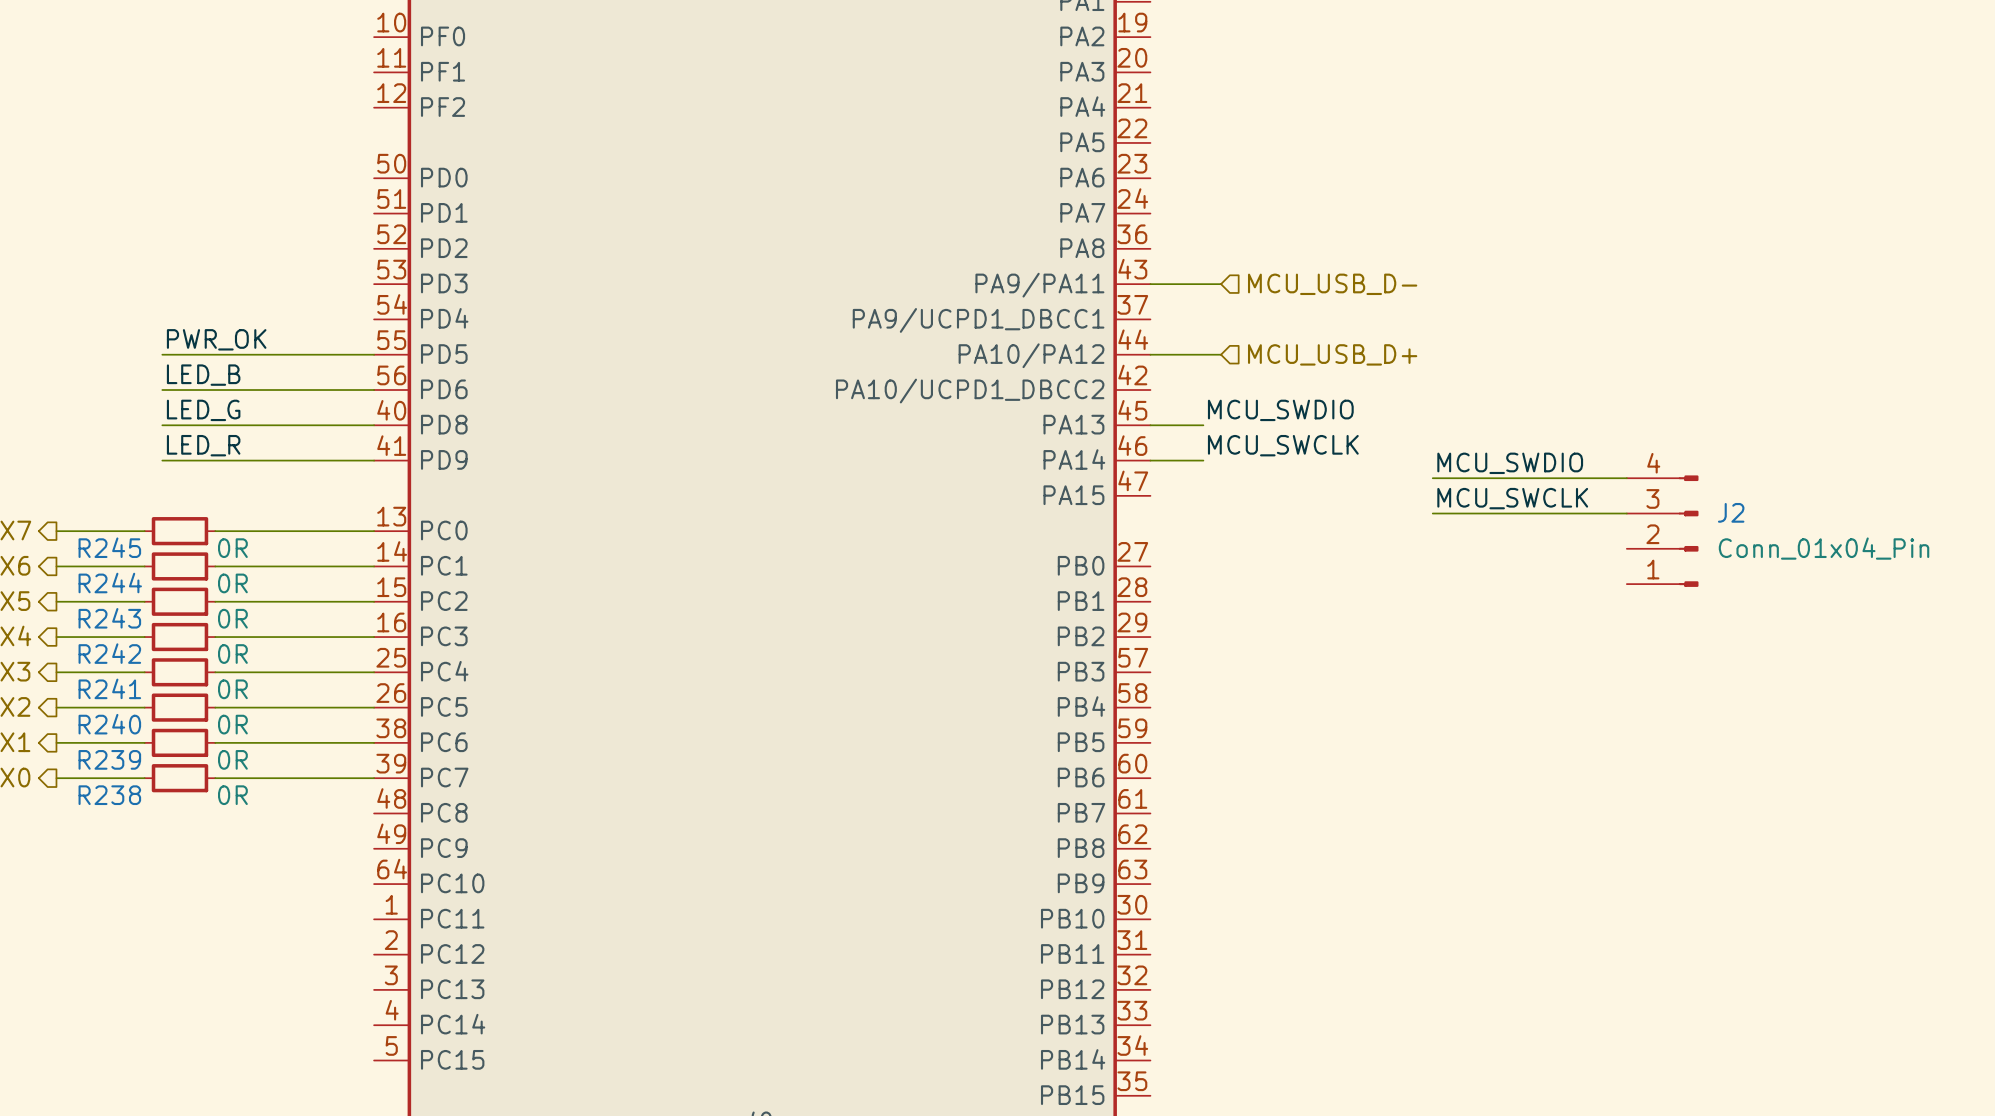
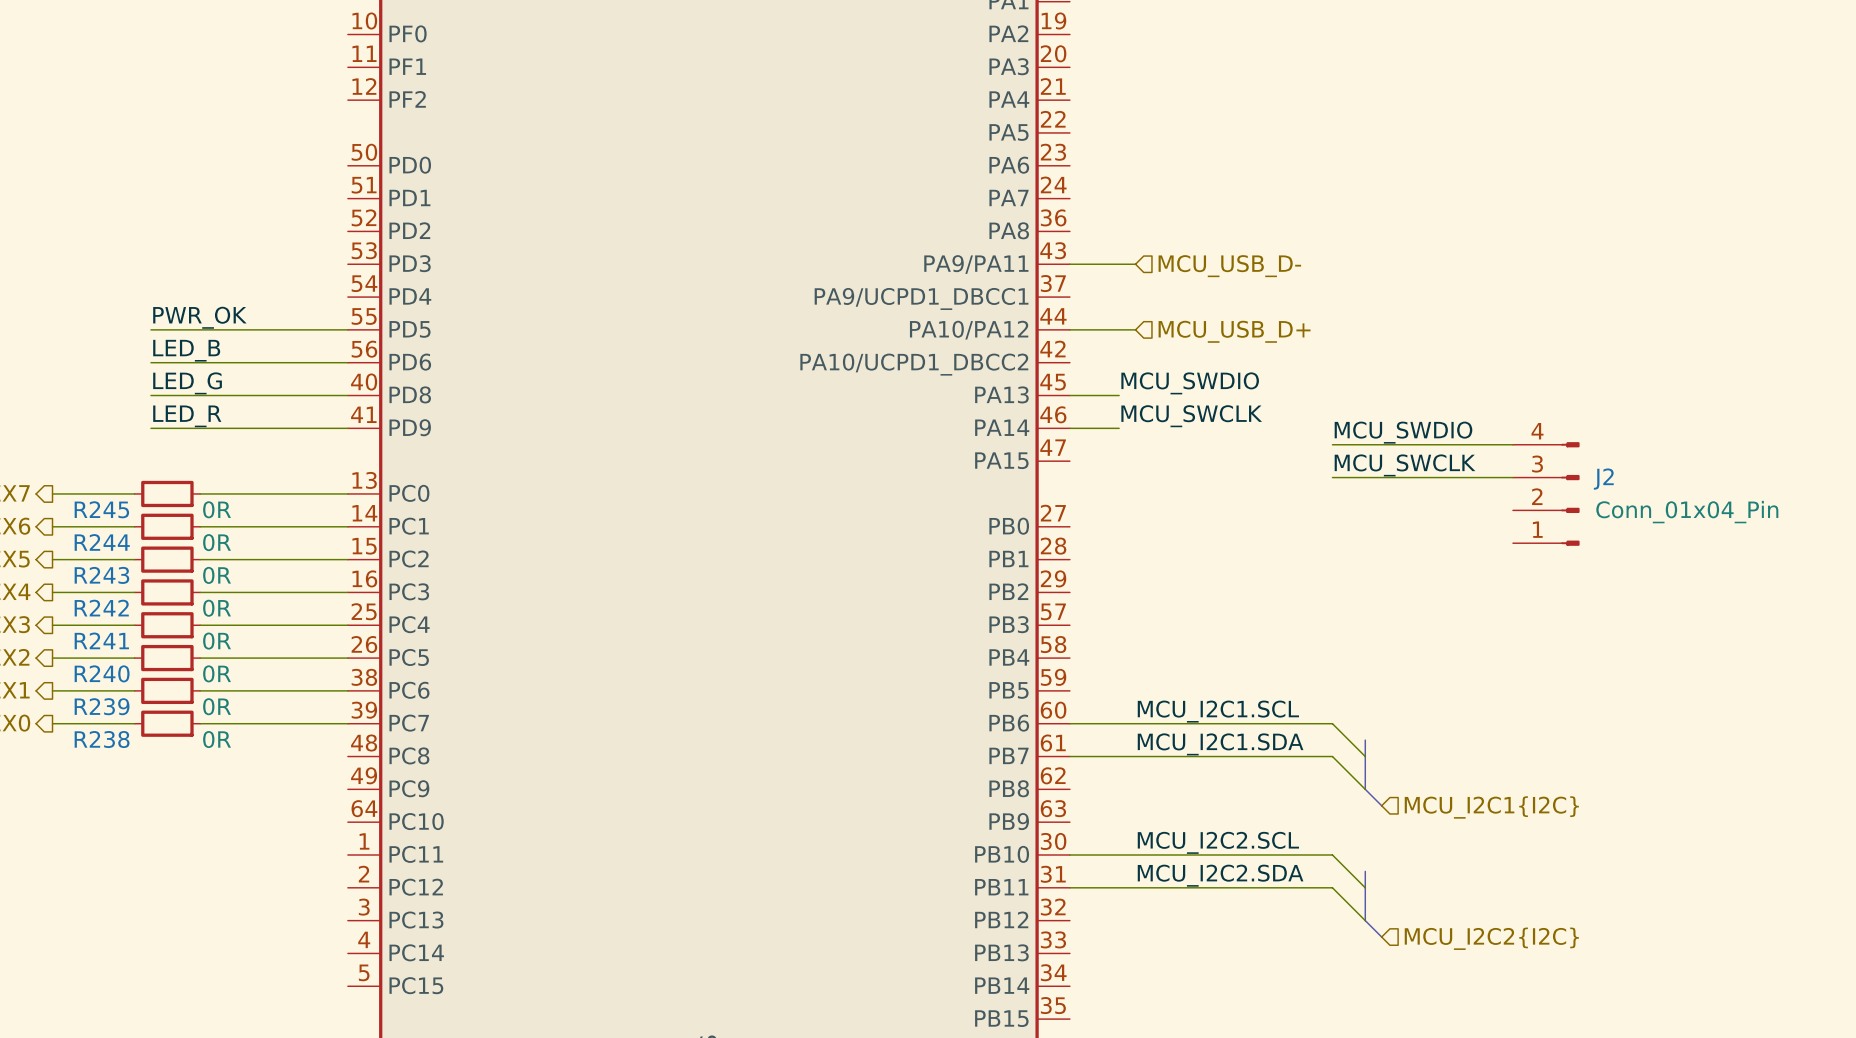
label: none -> MCU_I2C1.SCL (1218, 711)
wire: none -> (1069, 723) (1332, 723) (1365, 756)
bus: none -> (1365, 740) (1365, 789) (1381, 805)
label: none -> MCU_I2C1.SDA (1220, 744)
wire: none -> (1069, 756) (1332, 756) (1365, 789)
hierarchical label: none -> MCU_I2C1{I2C} (1491, 807)
label: none -> MCU_I2C2.SCL (1218, 842)
wire: none -> (1069, 854) (1332, 854) (1365, 887)
bus: none -> (1365, 871) (1365, 920) (1381, 937)
label: none -> MCU_I2C2.SDA (1220, 875)
wire: none -> (1069, 887) (1332, 887) (1365, 920)
hierarchical label: none -> MCU_I2C2{I2C} (1491, 938)

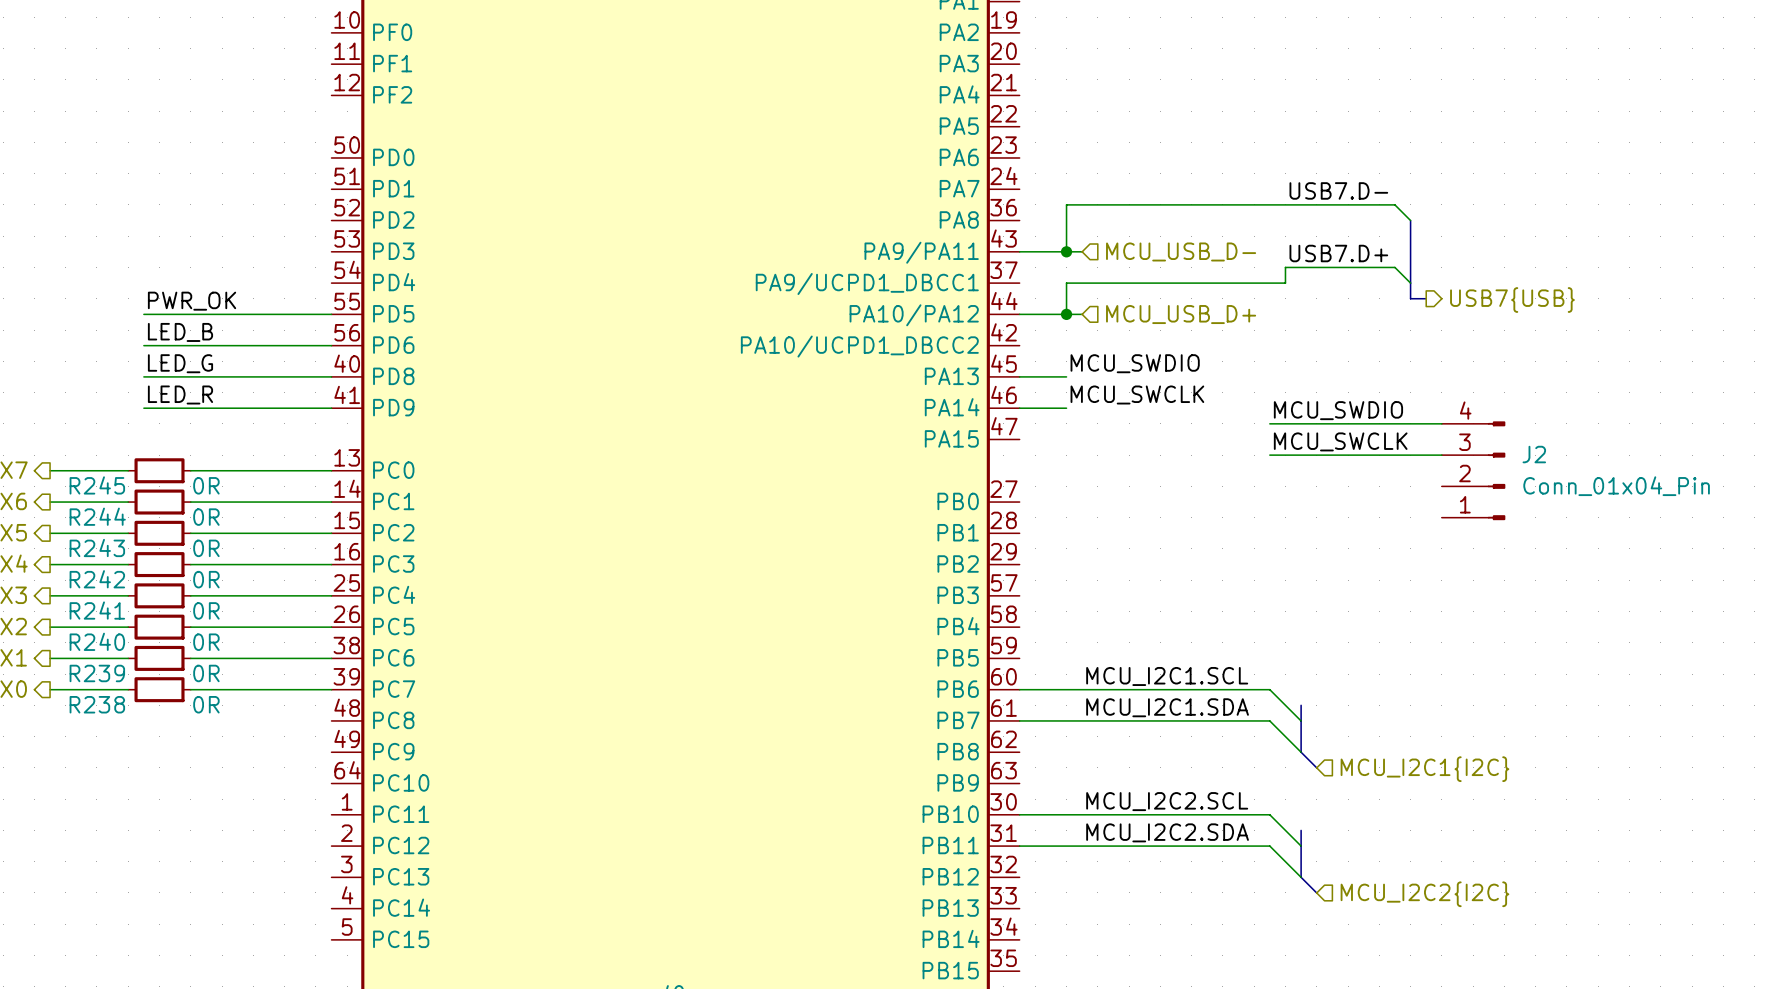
label: none -> USB7.D- (1338, 190)
wire: none -> (1410, 220) (1394, 204) (1066, 204) (1066, 251)
bus: none -> (1410, 220) (1410, 298) (1426, 298)
junction: none -> (1066, 251)
label: none -> USB7.D+ (1338, 253)
wire: none -> (1410, 283) (1394, 267) (1285, 267) (1285, 283) (1066, 283) (1066, 314)
hierarchical label: none -> USB7{USB} (1512, 300)
junction: none -> (1066, 314)

